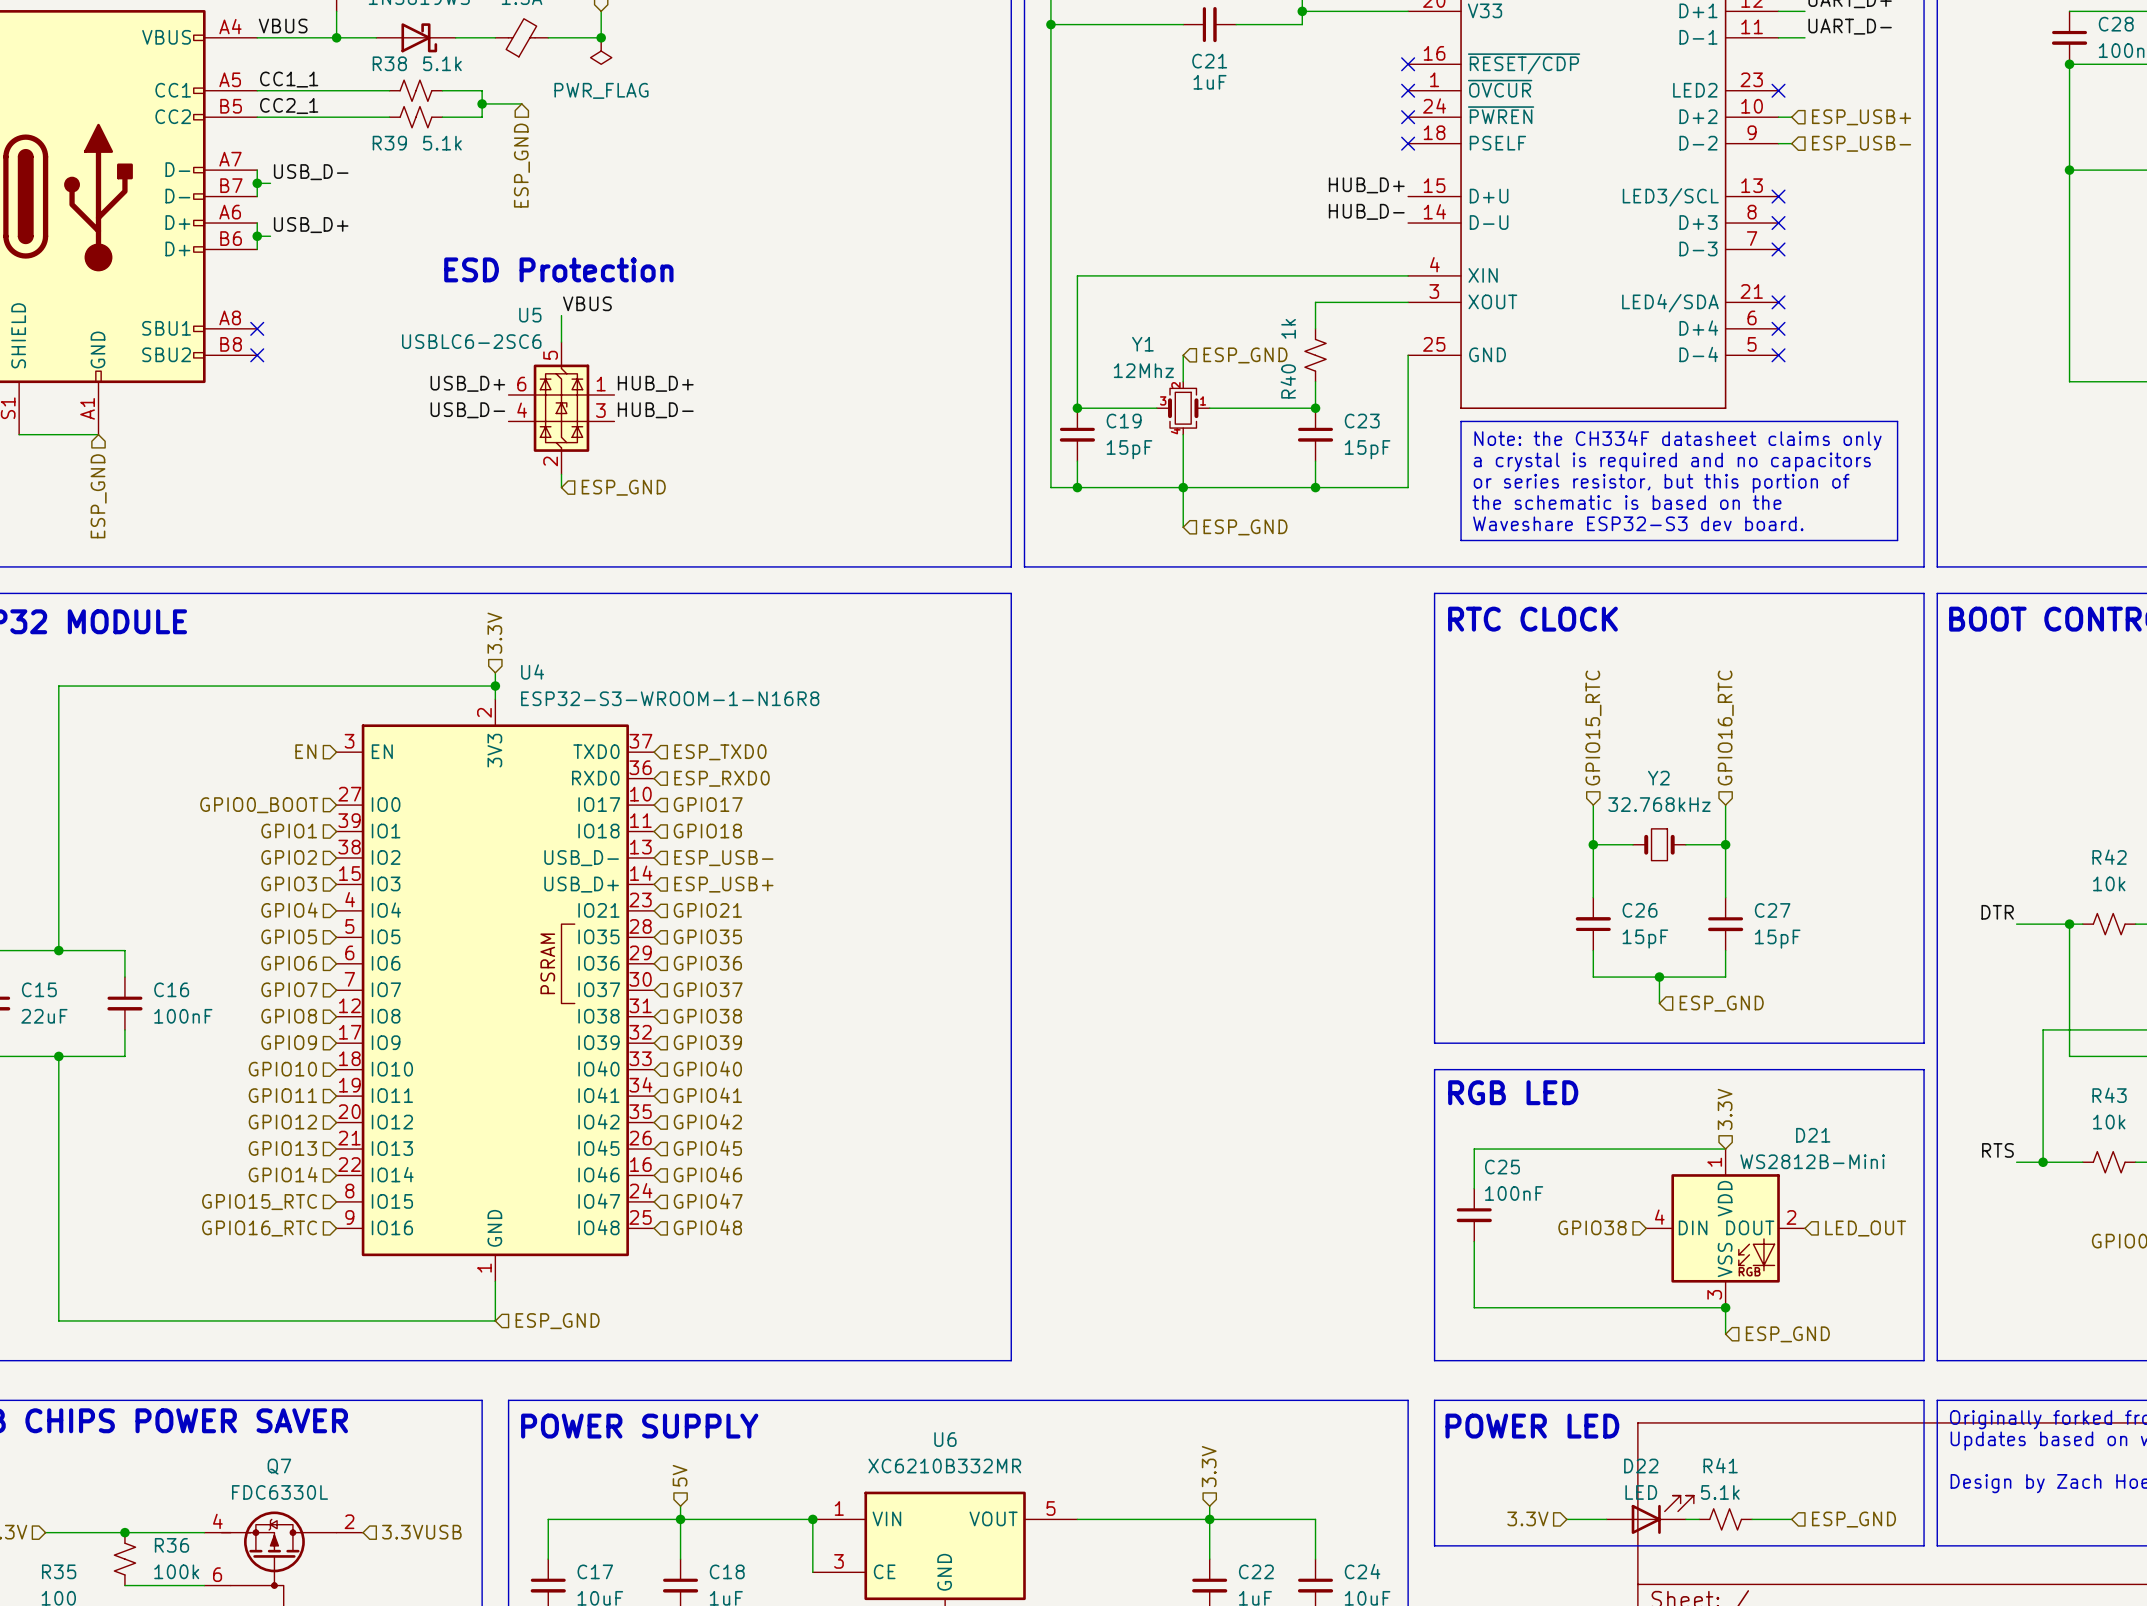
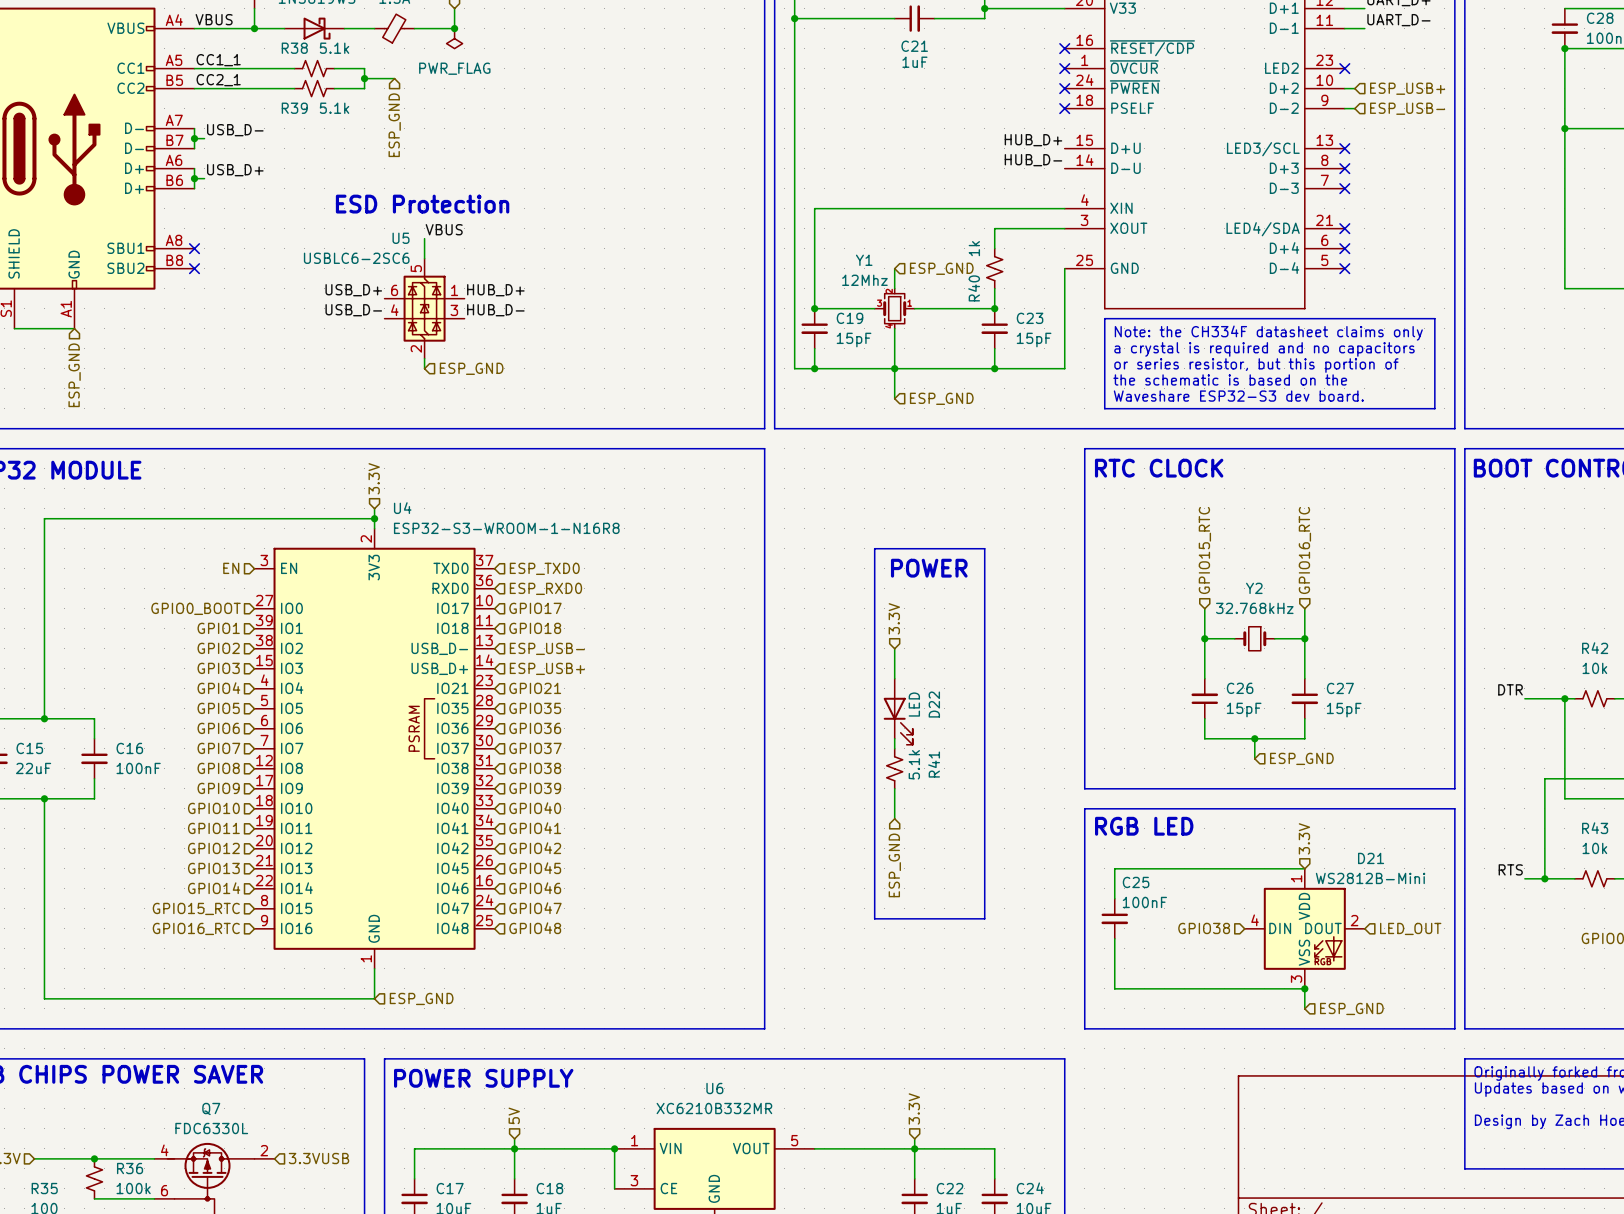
line: none -> (874, 548) (984, 548) (984, 918) (874, 918) (874, 548)
text: none -> POWER (929, 568)
hierarchical label: none -> 3.3V (894, 618)
wire: none -> (894, 648) (894, 678)
wire: none -> (894, 738) (894, 748)
wire: none -> (894, 788) (894, 818)
hierarchical label: none -> ESP_GND (894, 865)
line: (1434, 1400) (1924, 1400) (1924, 1545) (1434, 1545) (1434, 1400) -> none
text: POWER LED (1532, 1426) -> none
D22 position: (1650, 1514) -> (898, 711)
D22 rotation: 0° (1662, 1514) -> 90° clockwise (898, 721)
hierarchical label: 3.3V (1527, 1518) -> none
wire: (1566, 1519) (1606, 1519) -> none
wire: (1685, 1519) (1699, 1519) -> none
R41 rotation: 0° (1725, 1519) -> 90° clockwise (894, 768)
R41 position: (1725, 1519) -> (894, 768)
wire: (1752, 1519) (1791, 1519) -> none
hierarchical label: ESP_GND (1854, 1519) -> none

